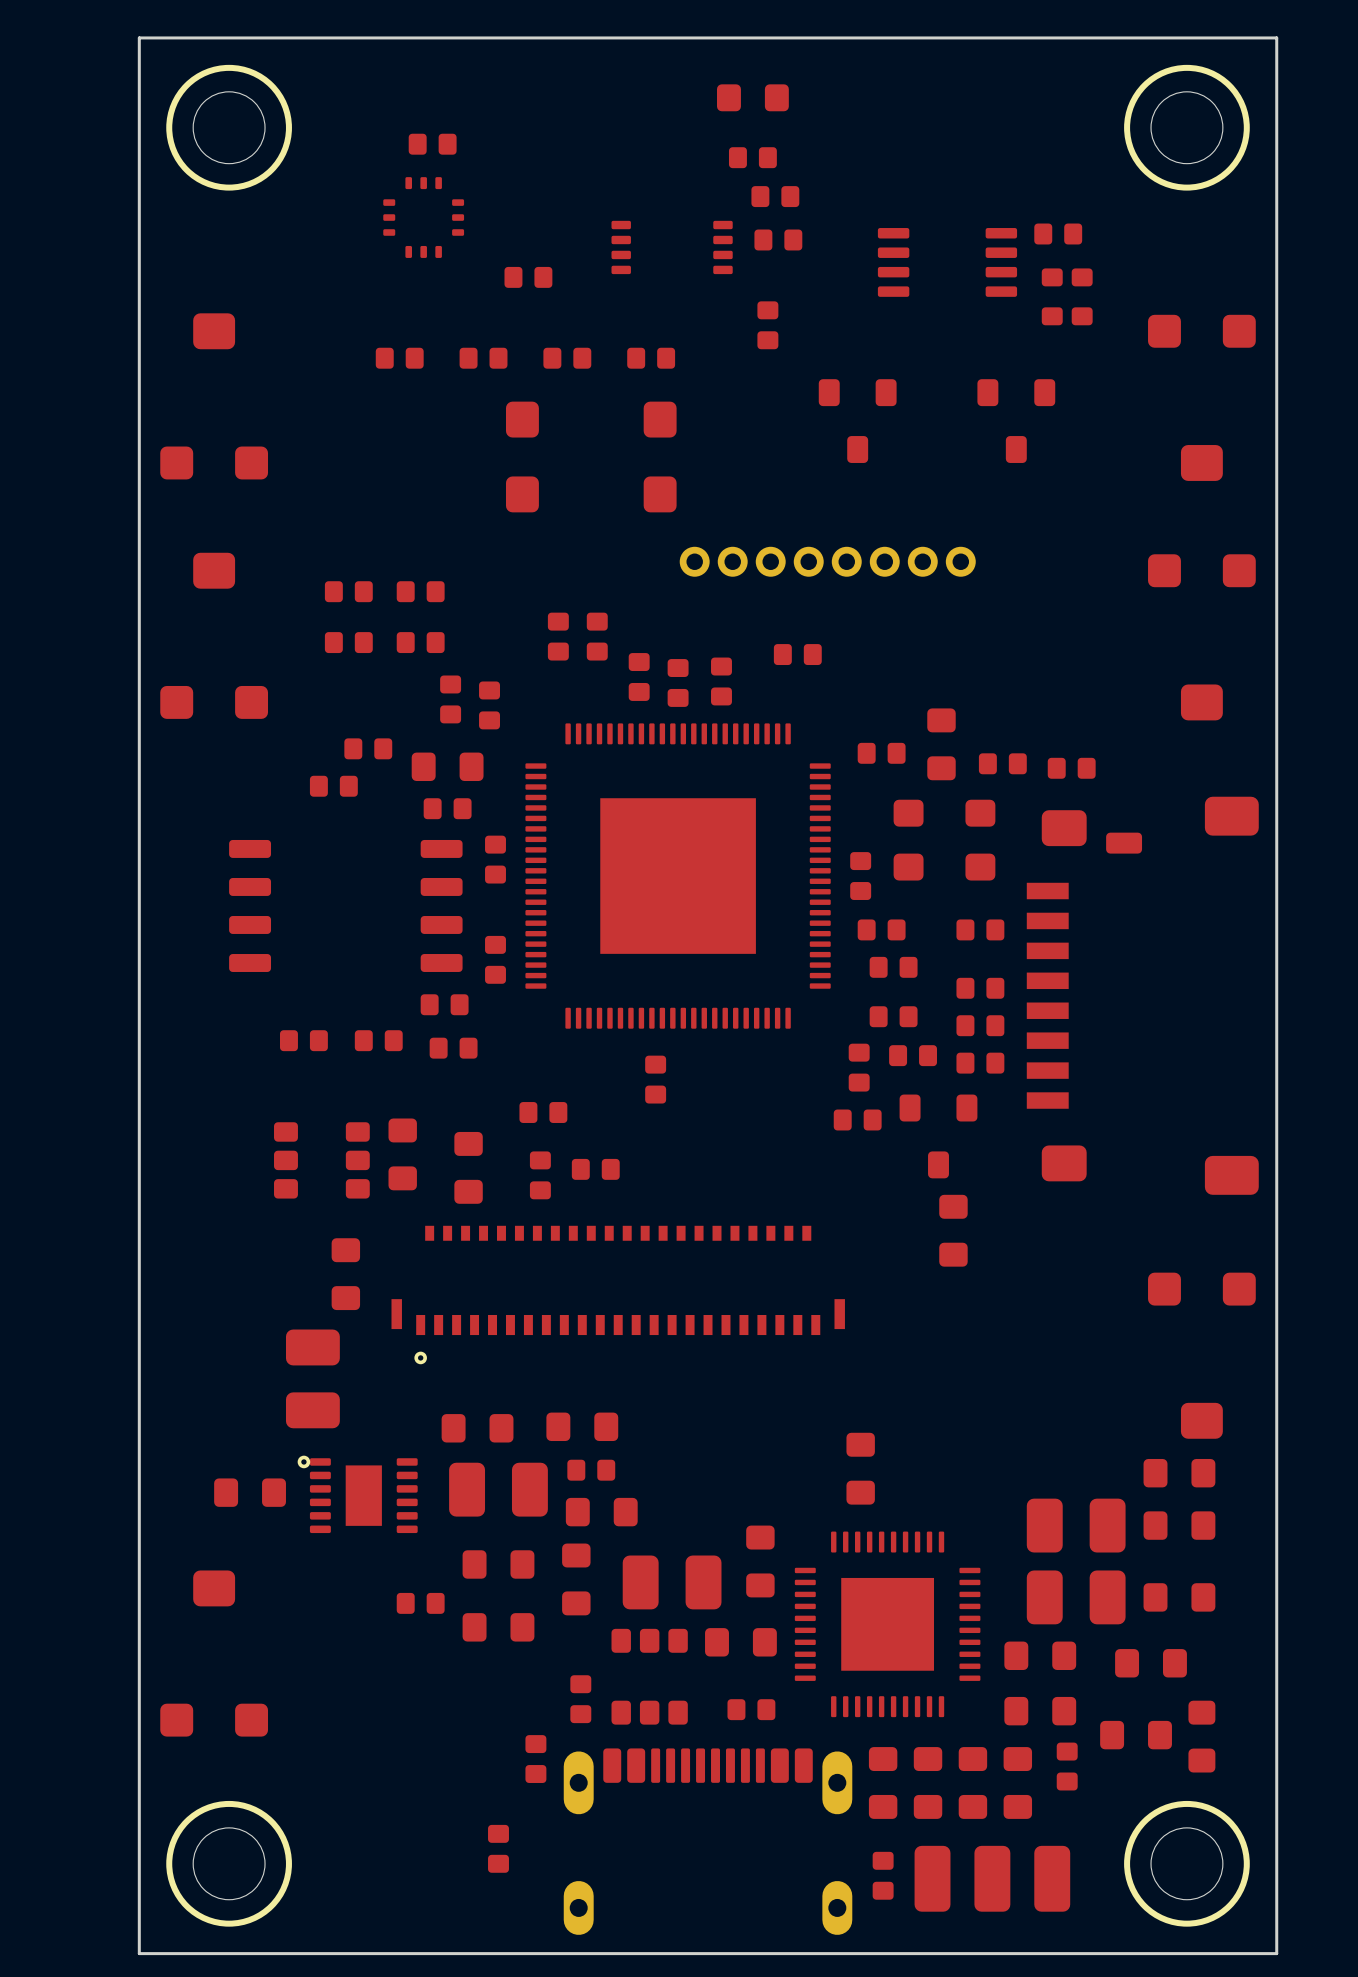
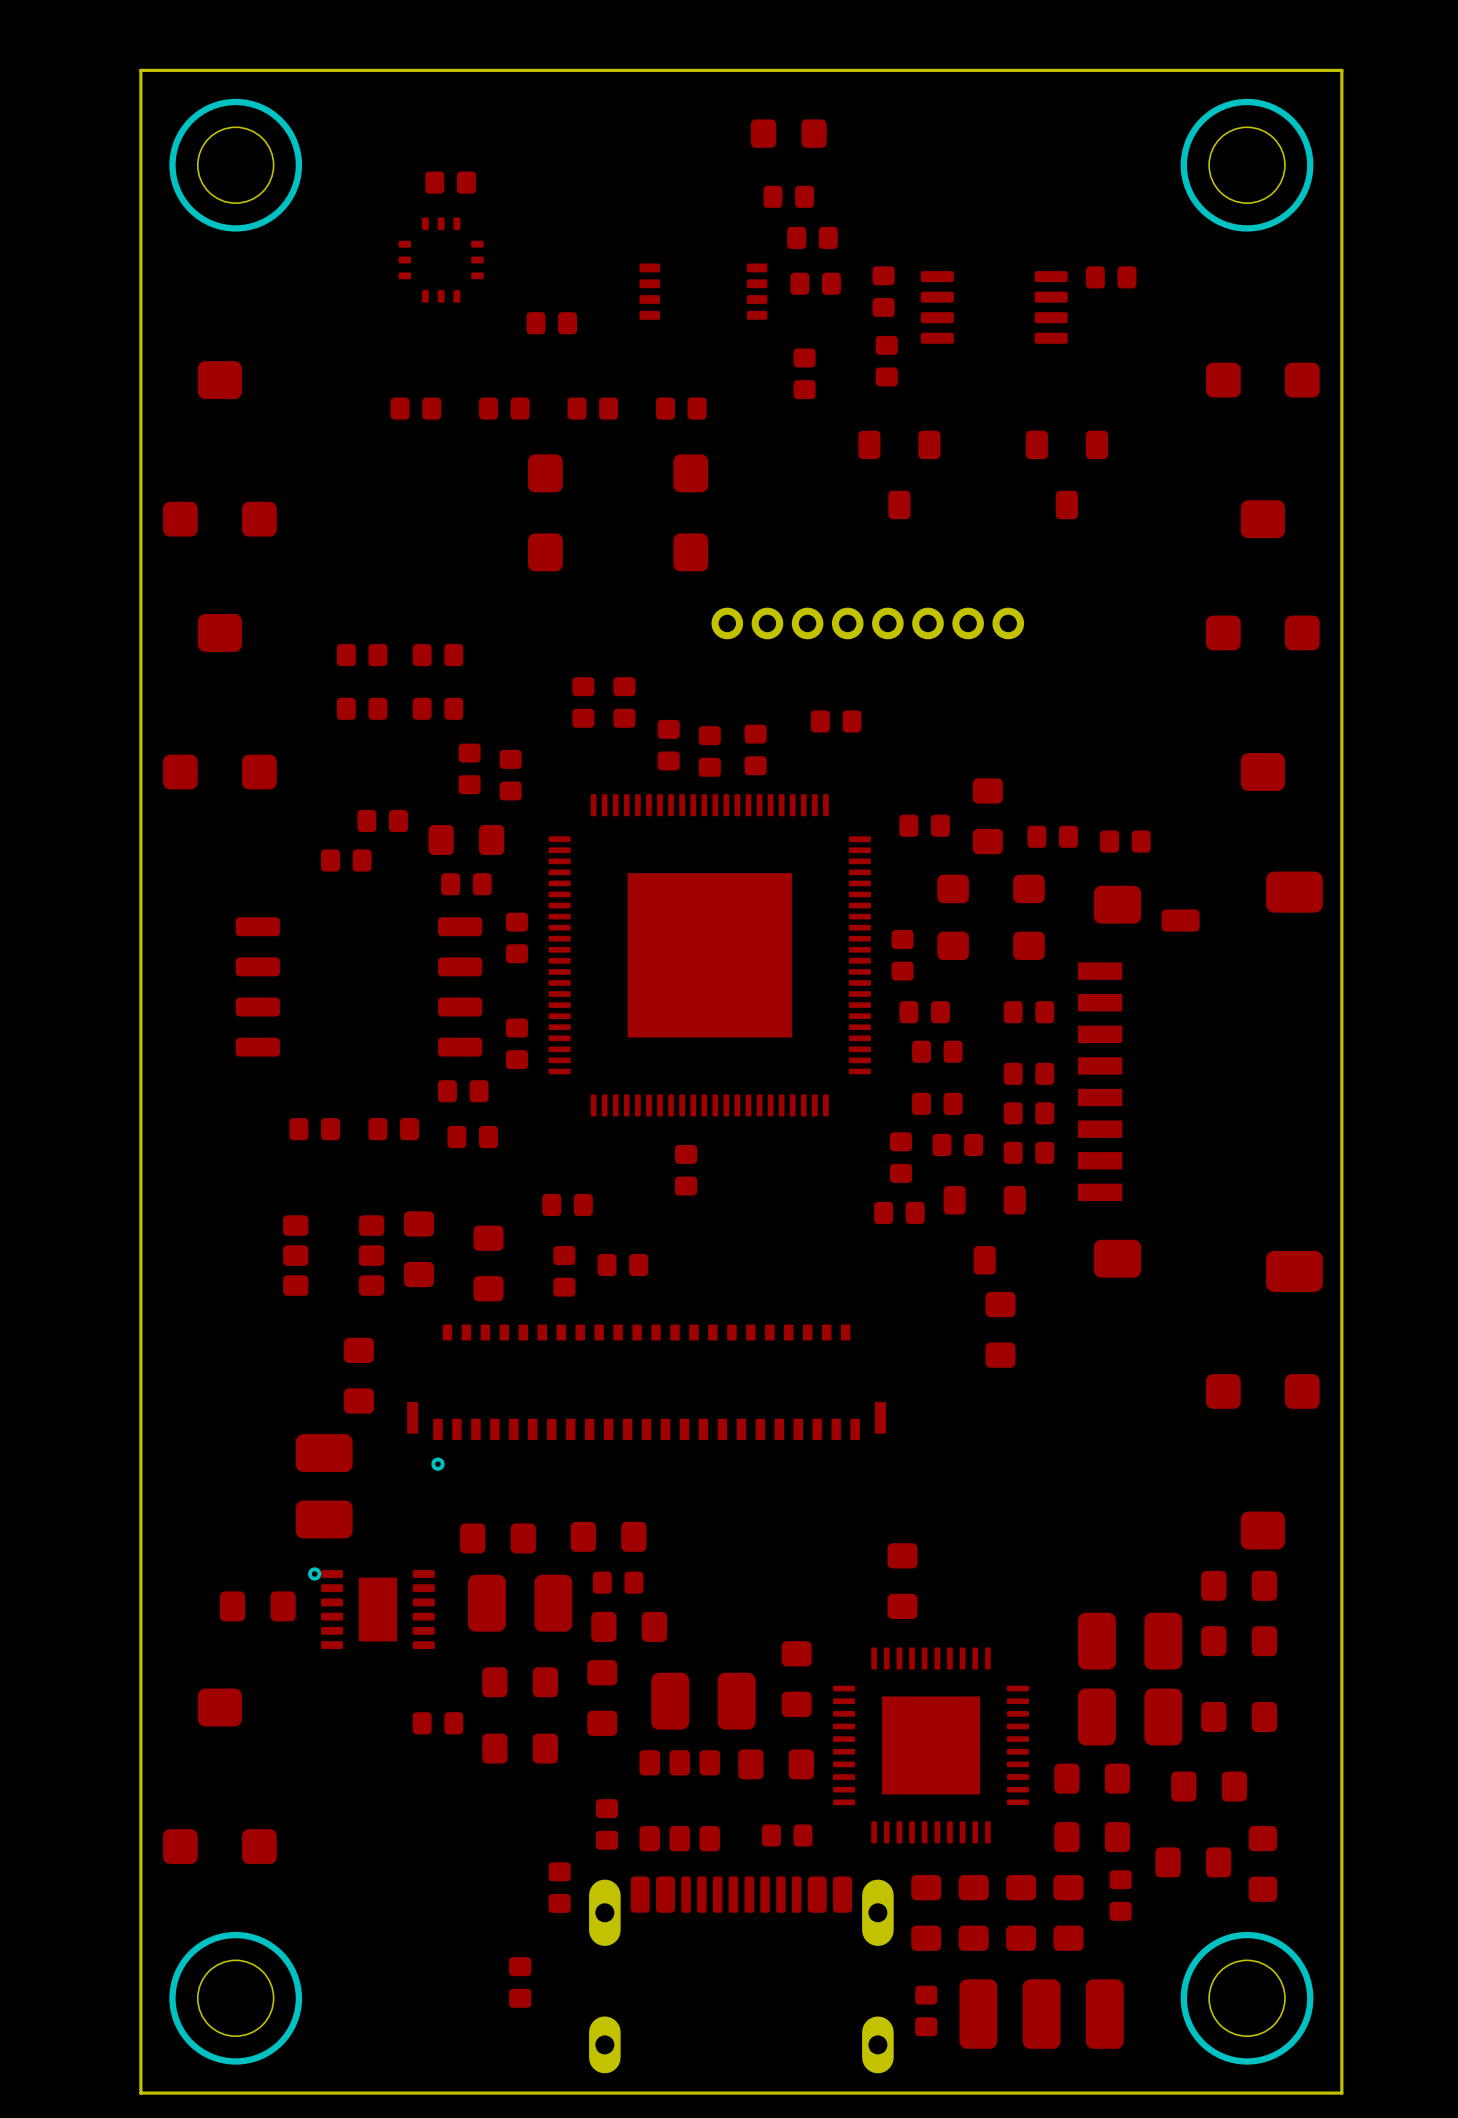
part: none -> (883, 291)
part: (1067, 277) -> none
part: none -> (886, 361)
part: (1067, 316) -> none

